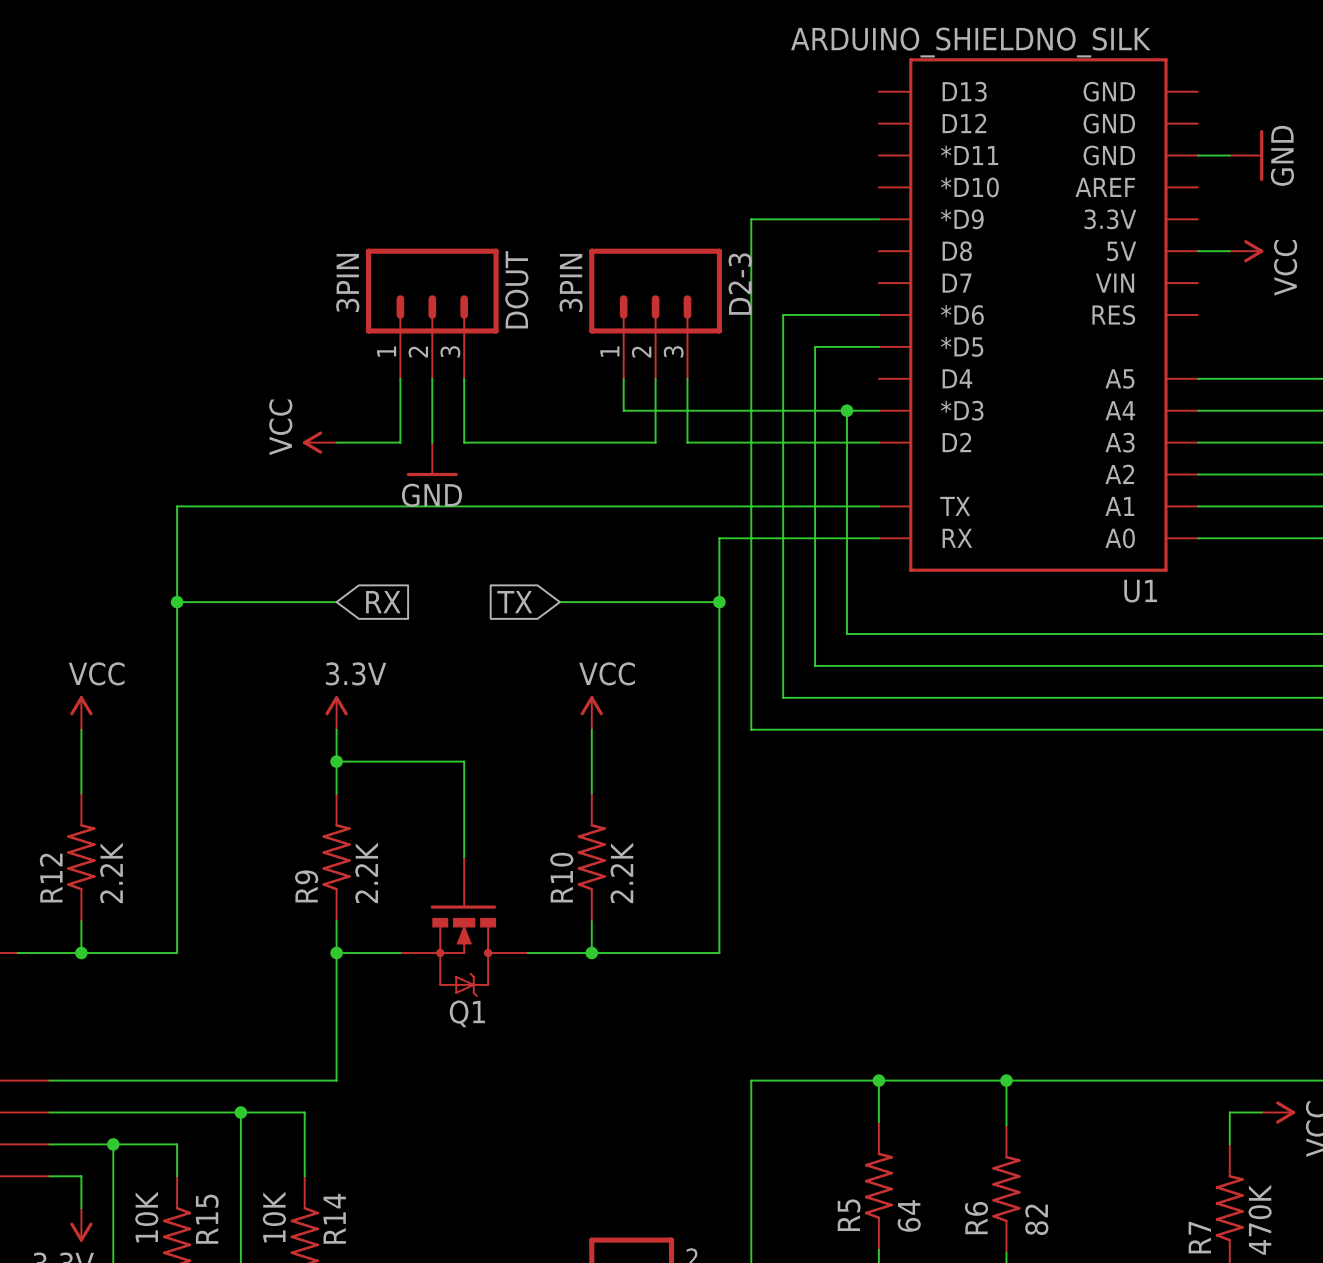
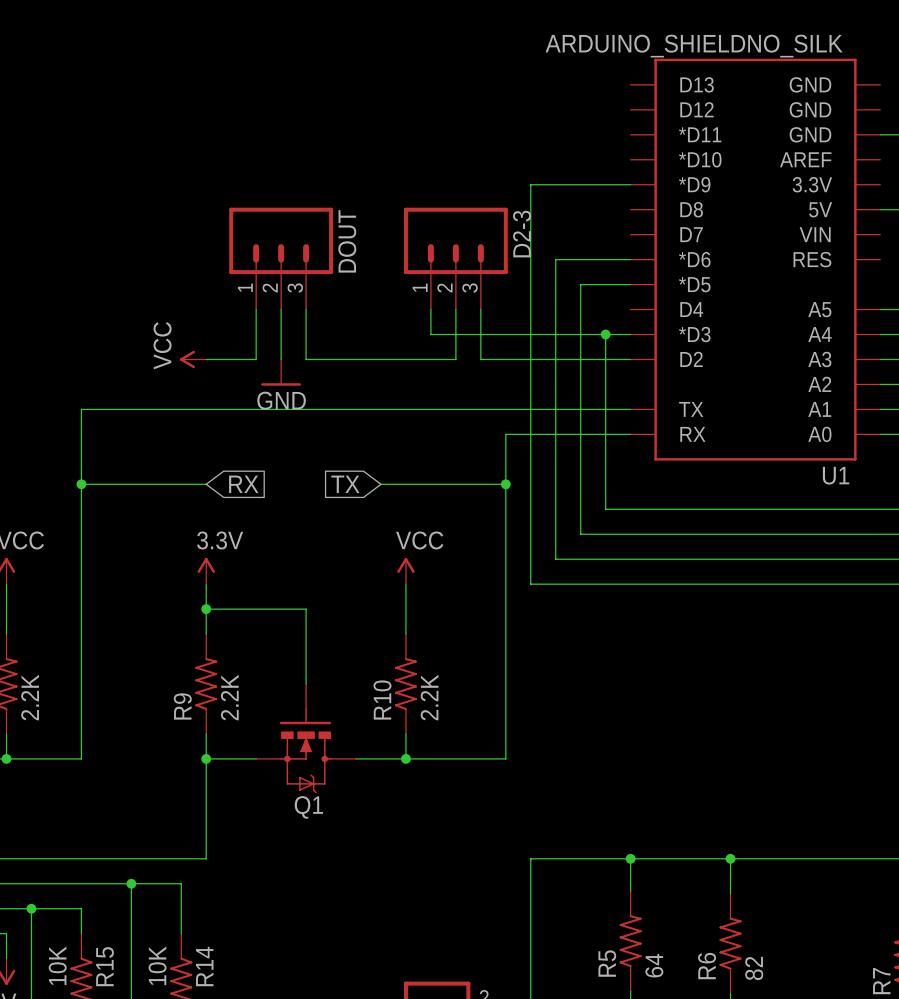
DOUT value: 3PIN (347, 282) -> none
D2-3 value: 3PIN (571, 282) -> none

